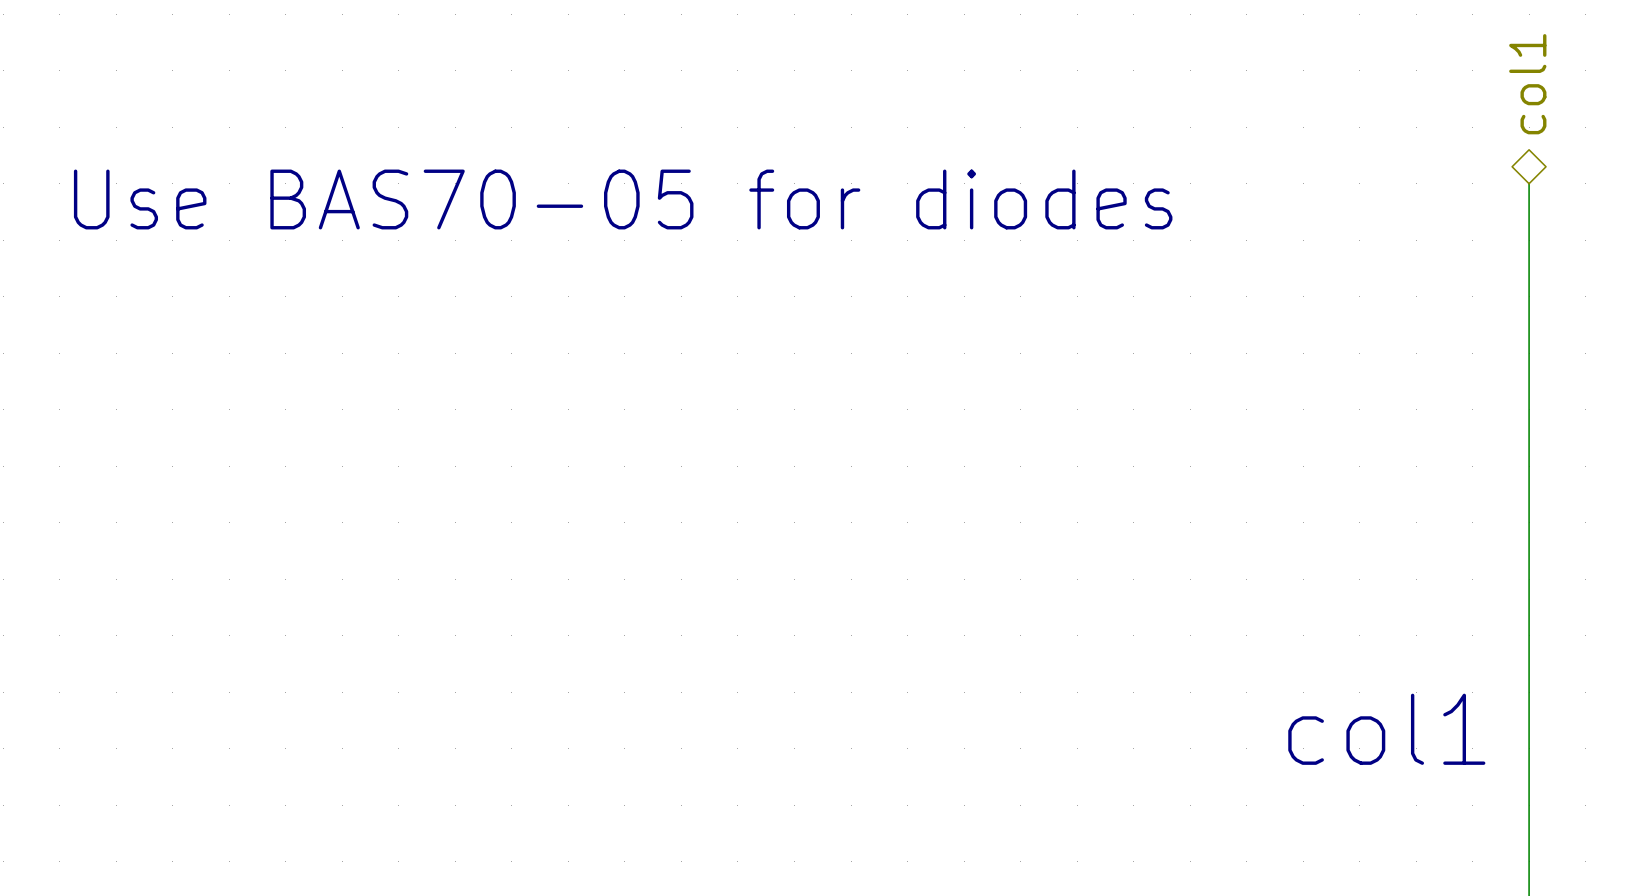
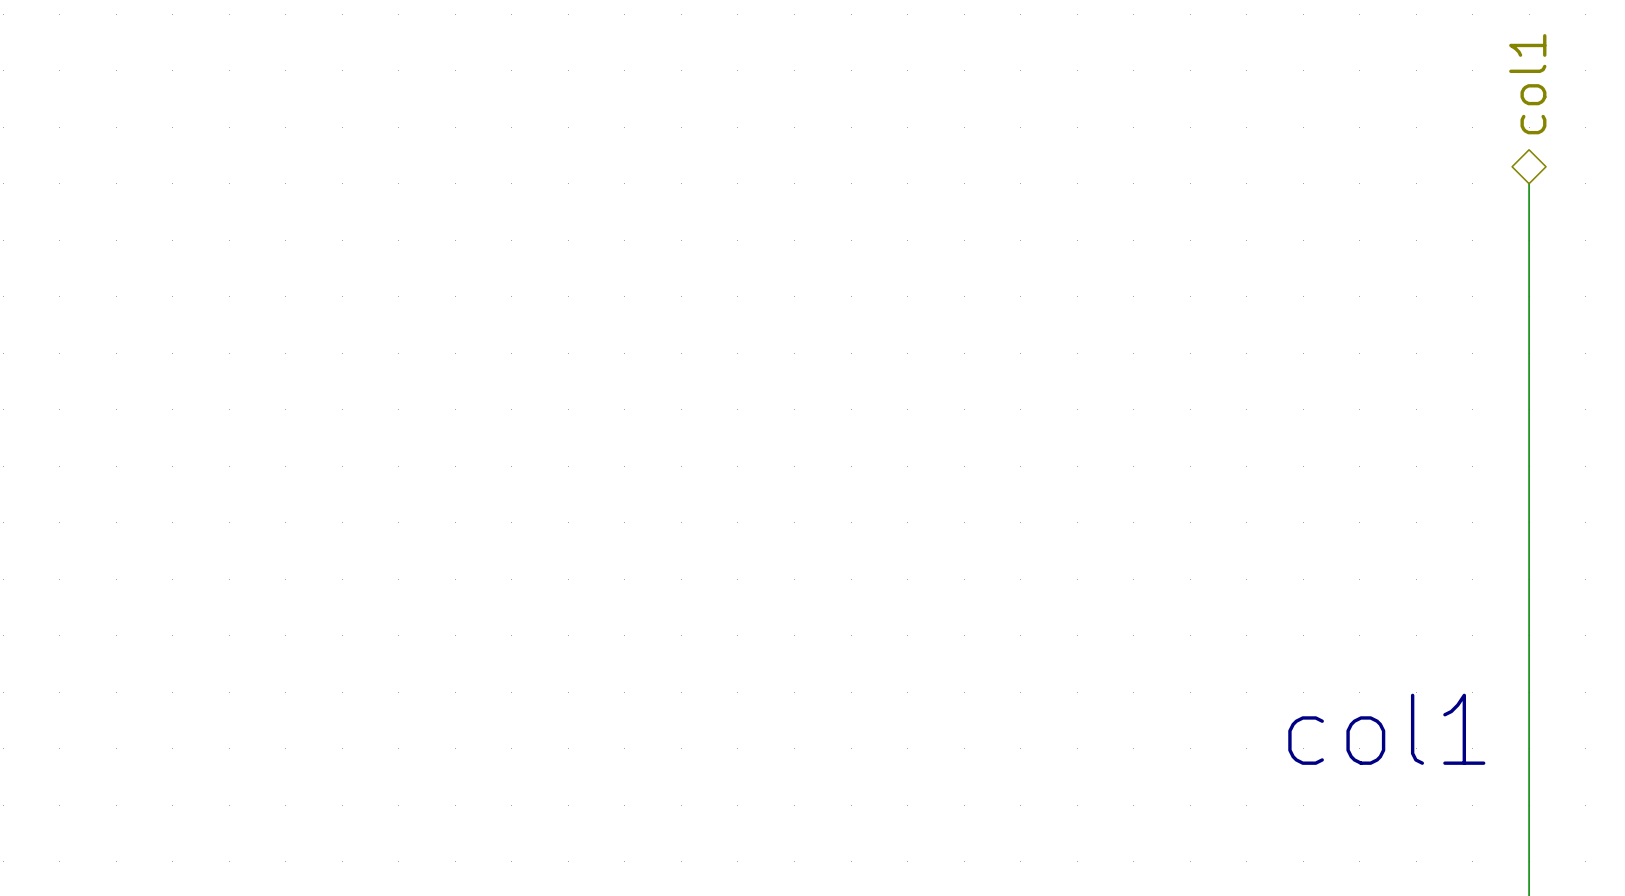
text: Use BAS70-05 for diodes (623, 199) -> none

